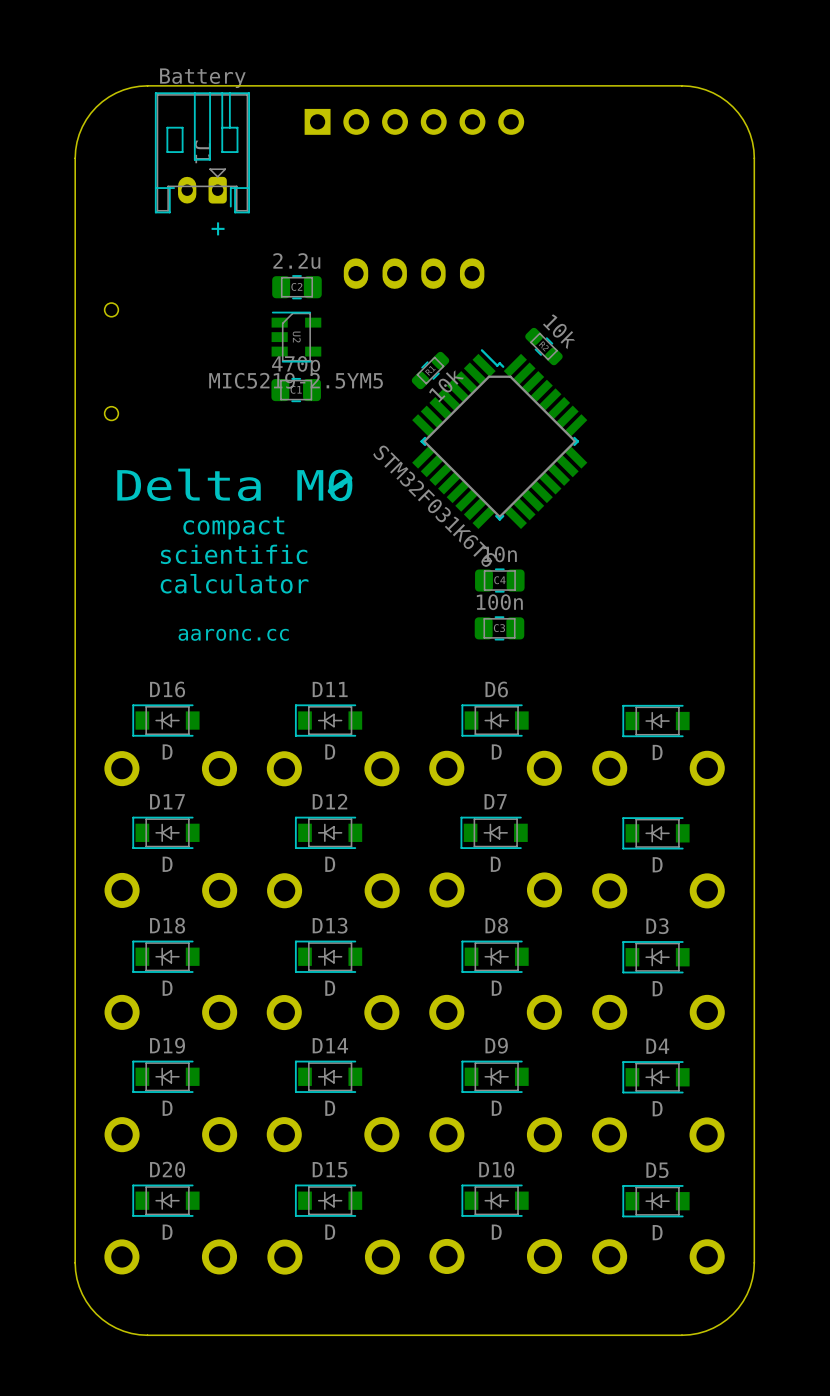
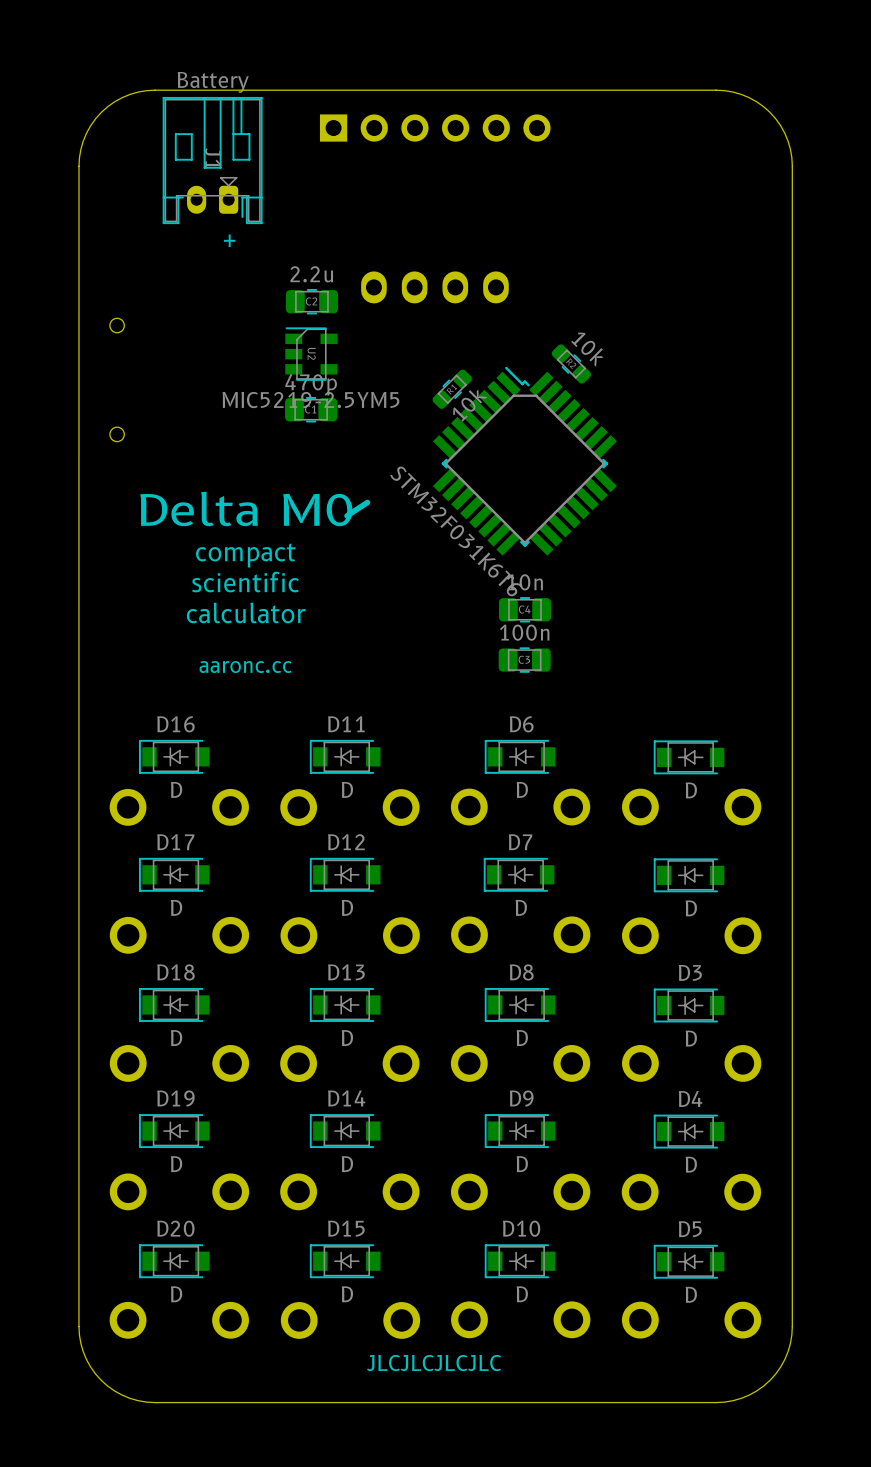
text: none -> JLCJLCJLCJLC (434, 1363)

